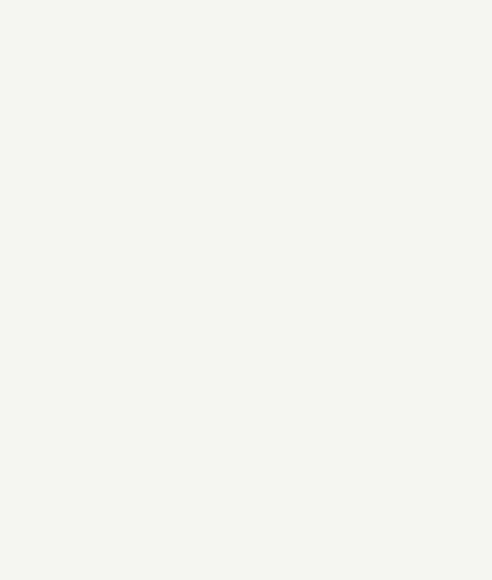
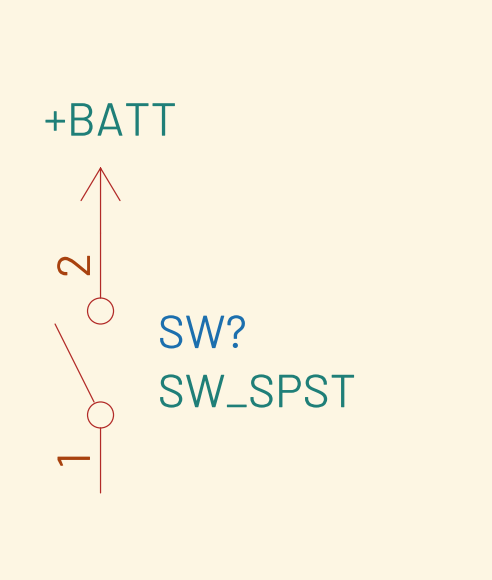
power symbol: none -> +BATT (100, 200)
SW?: none -> SW_SPST (84, 362)

